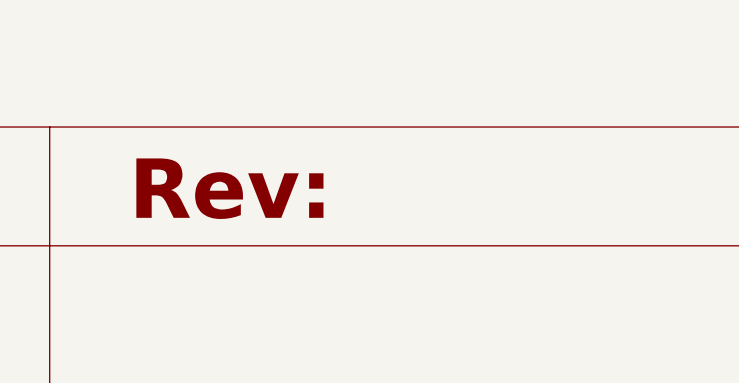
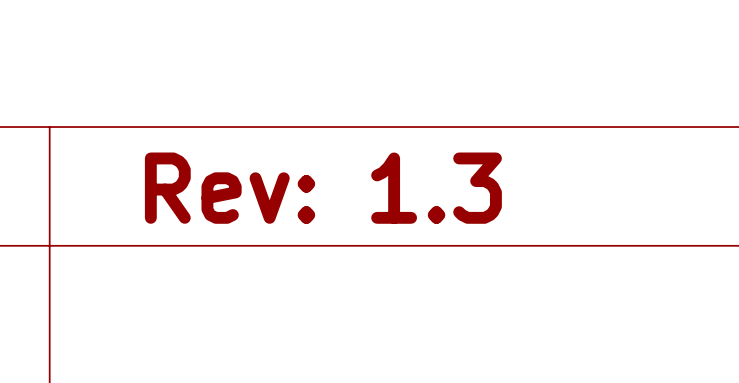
title block: Rev: (229, 188) -> Rev: 1.3 (323, 188)

